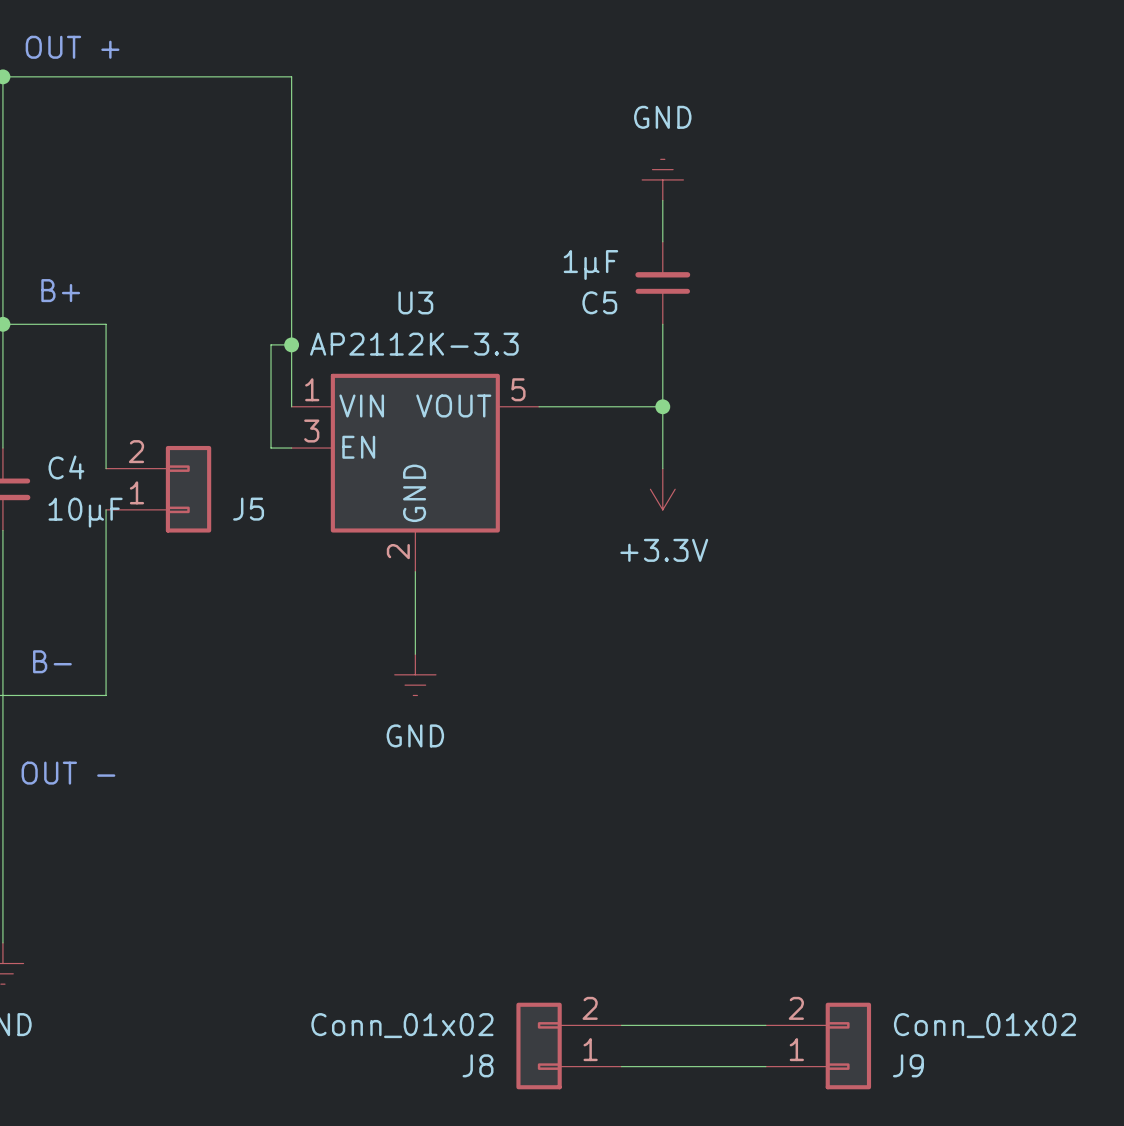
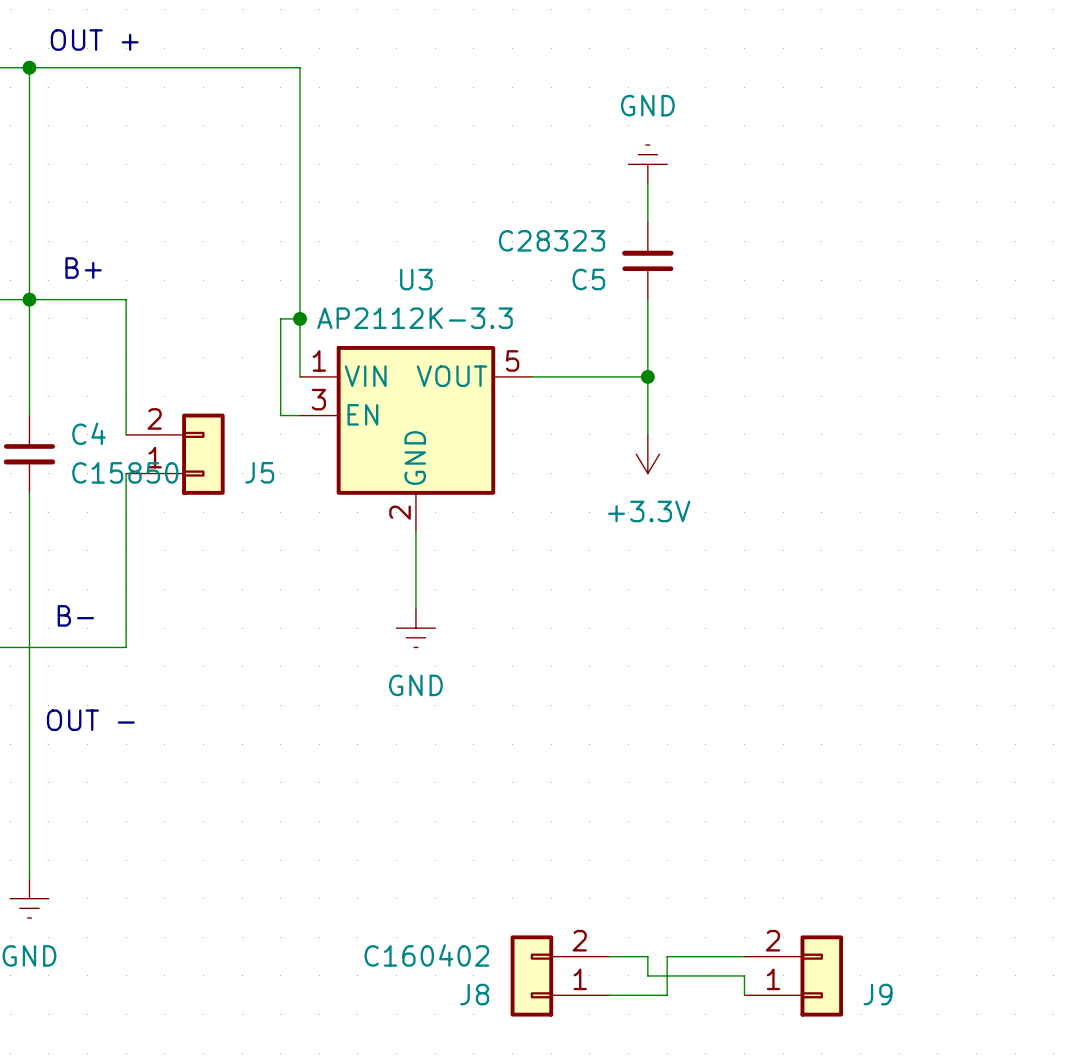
C5 value: 1µF (590, 265) -> C28323 (552, 240)
C4 value: 10µF (85, 512) -> C15850 (125, 472)
J8 value: Conn_01x02 (402, 1025) -> C160402 (426, 955)
wire: (662, 1025) (683, 1025) -> (667, 995) (667, 956)
J9 value: Conn_01x02 (985, 1025) -> none
wire: (683, 1066) (765, 1066) -> (647, 956) (647, 975) (744, 975) (744, 995)

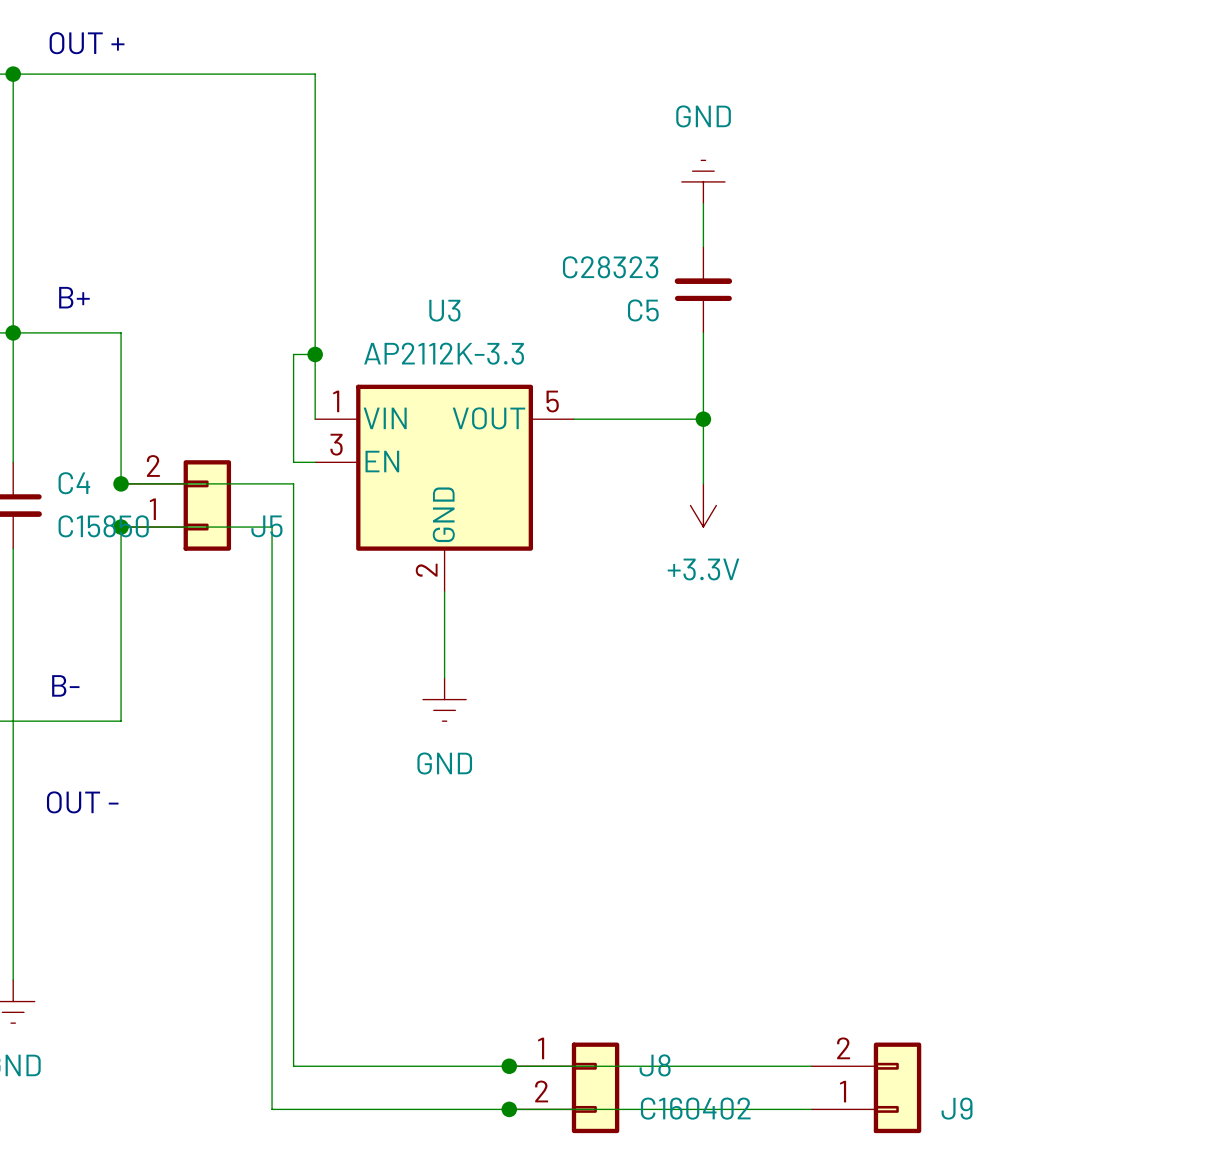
wire: none -> (121, 483) (293, 483) (293, 1066) (660, 1066)
junction: none -> (121, 483)
wire: none -> (121, 527) (272, 527) (272, 1109) (660, 1109)
junction: none -> (121, 527)
junction: none -> (509, 1066)
wire: (647, 956) (647, 975) (744, 975) (744, 995) -> (724, 1109) (811, 1109)
wire: (667, 956) (667, 995) -> (724, 1066) (703, 1066)
J8 rotation: 0° (531, 975) -> 180° (595, 1087)
junction: none -> (509, 1109)

